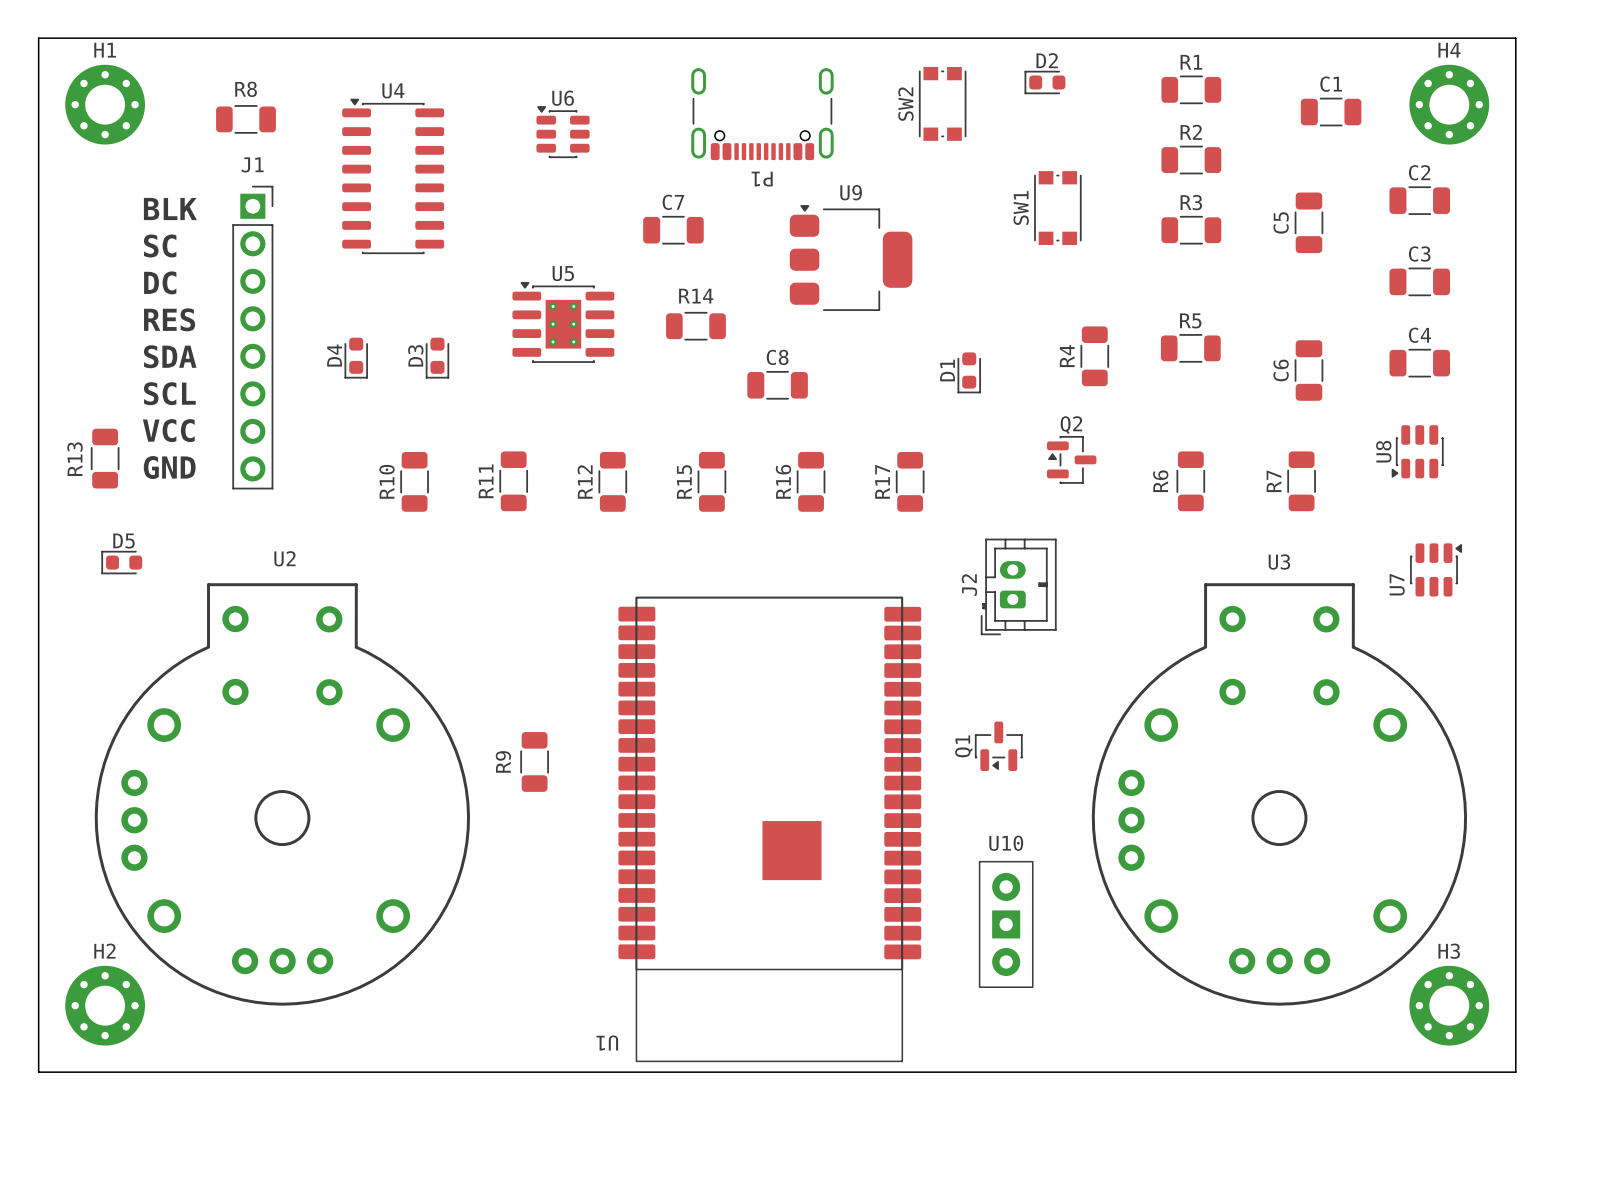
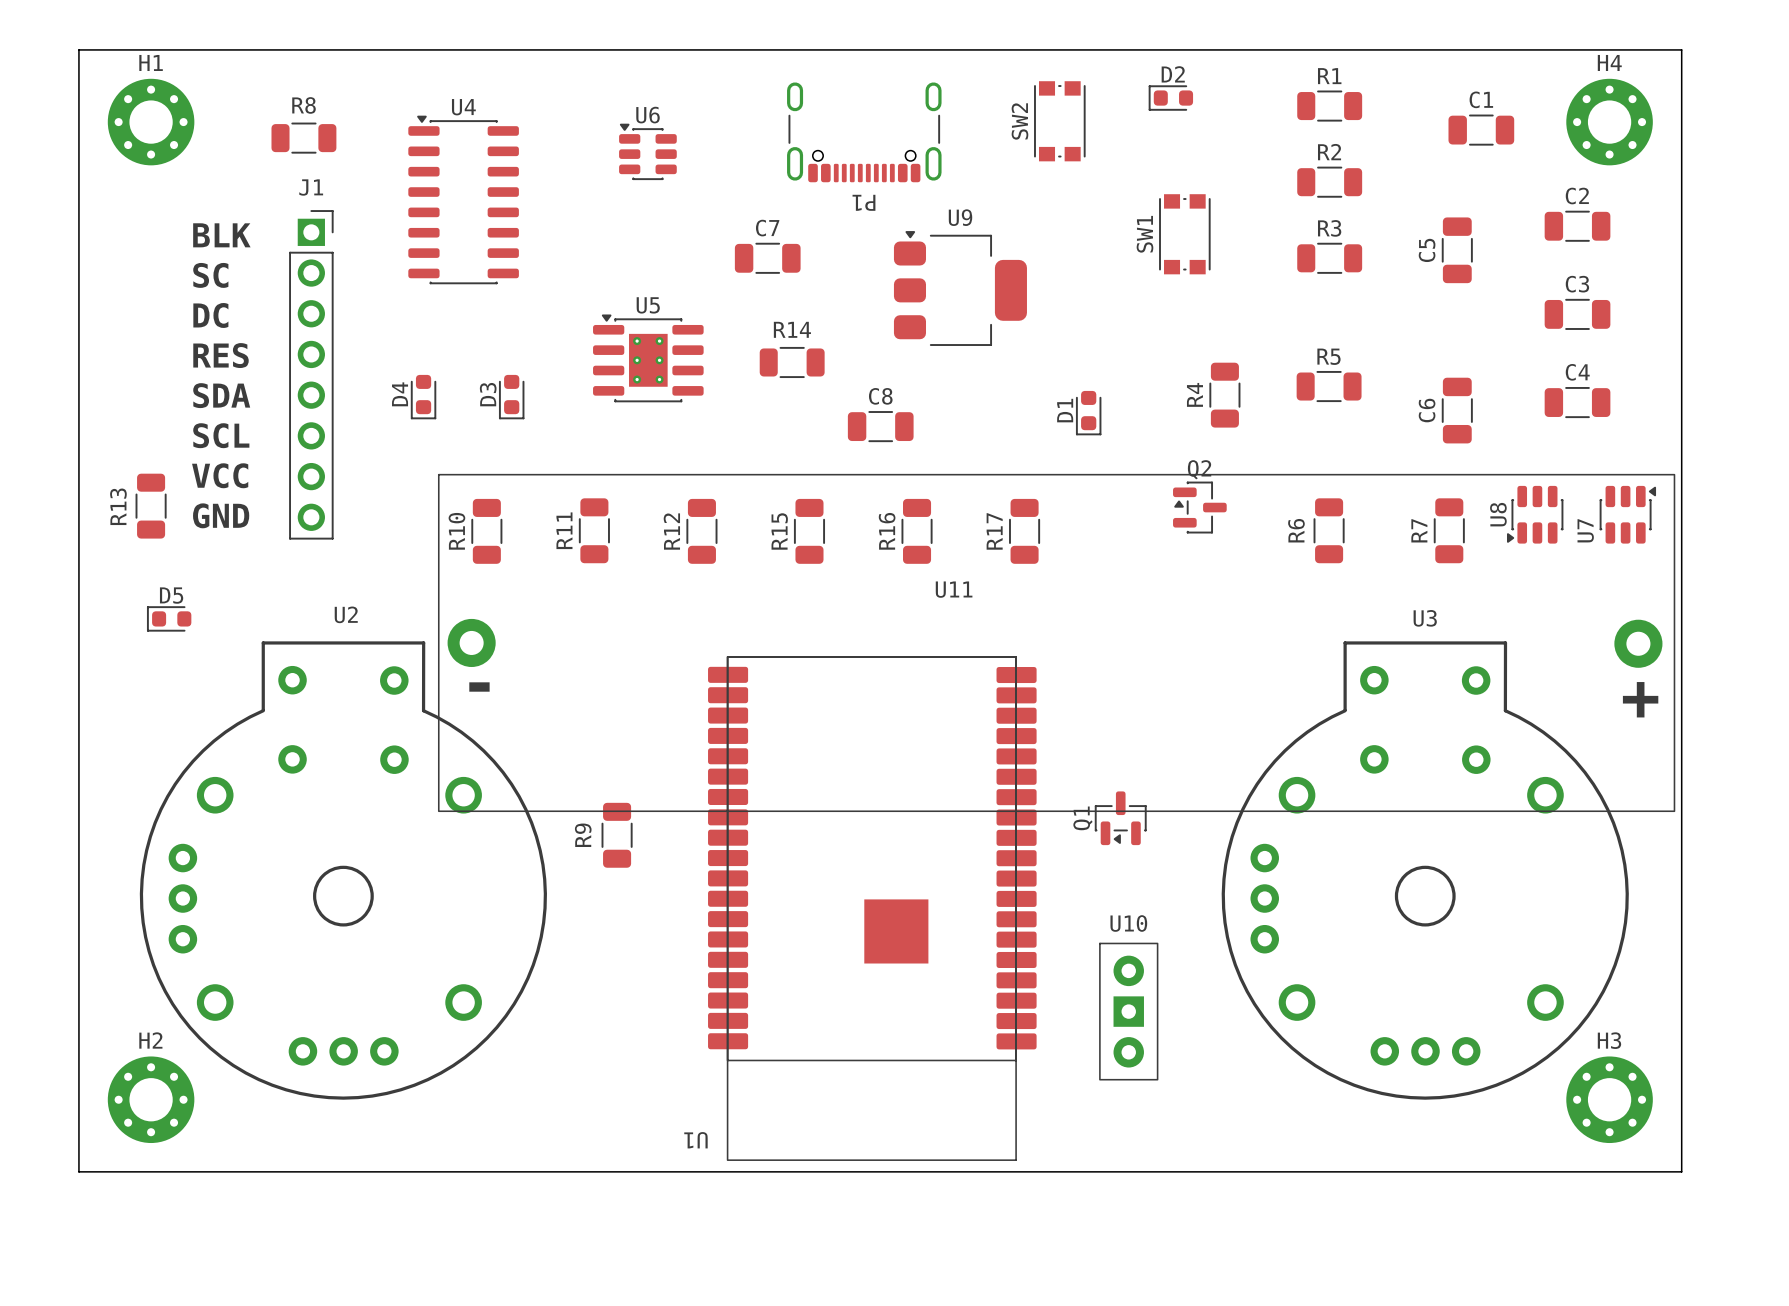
U8 position: (1417, 451) -> (1535, 514)
U7 position: (1436, 569) -> (1627, 514)
U11: none -> (1056, 642)
J2: (1018, 586) -> none

